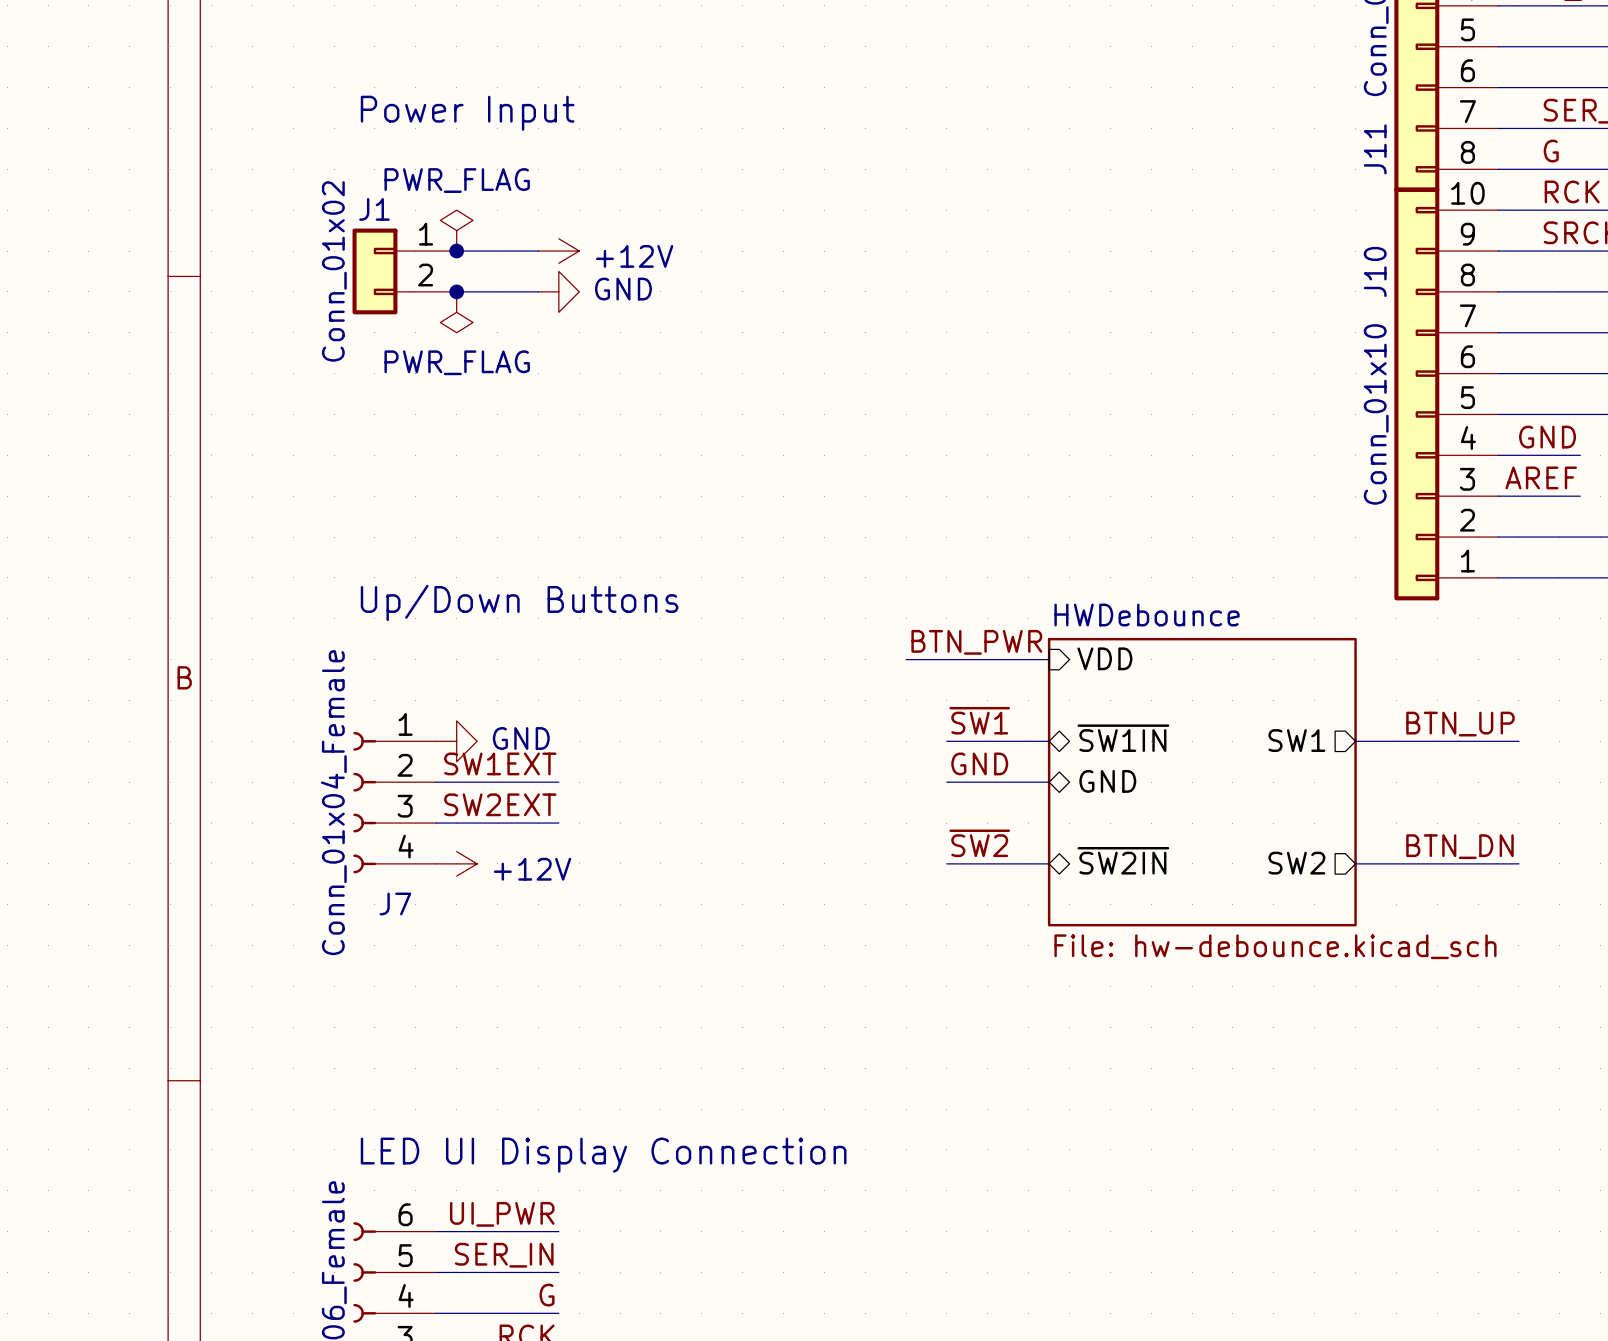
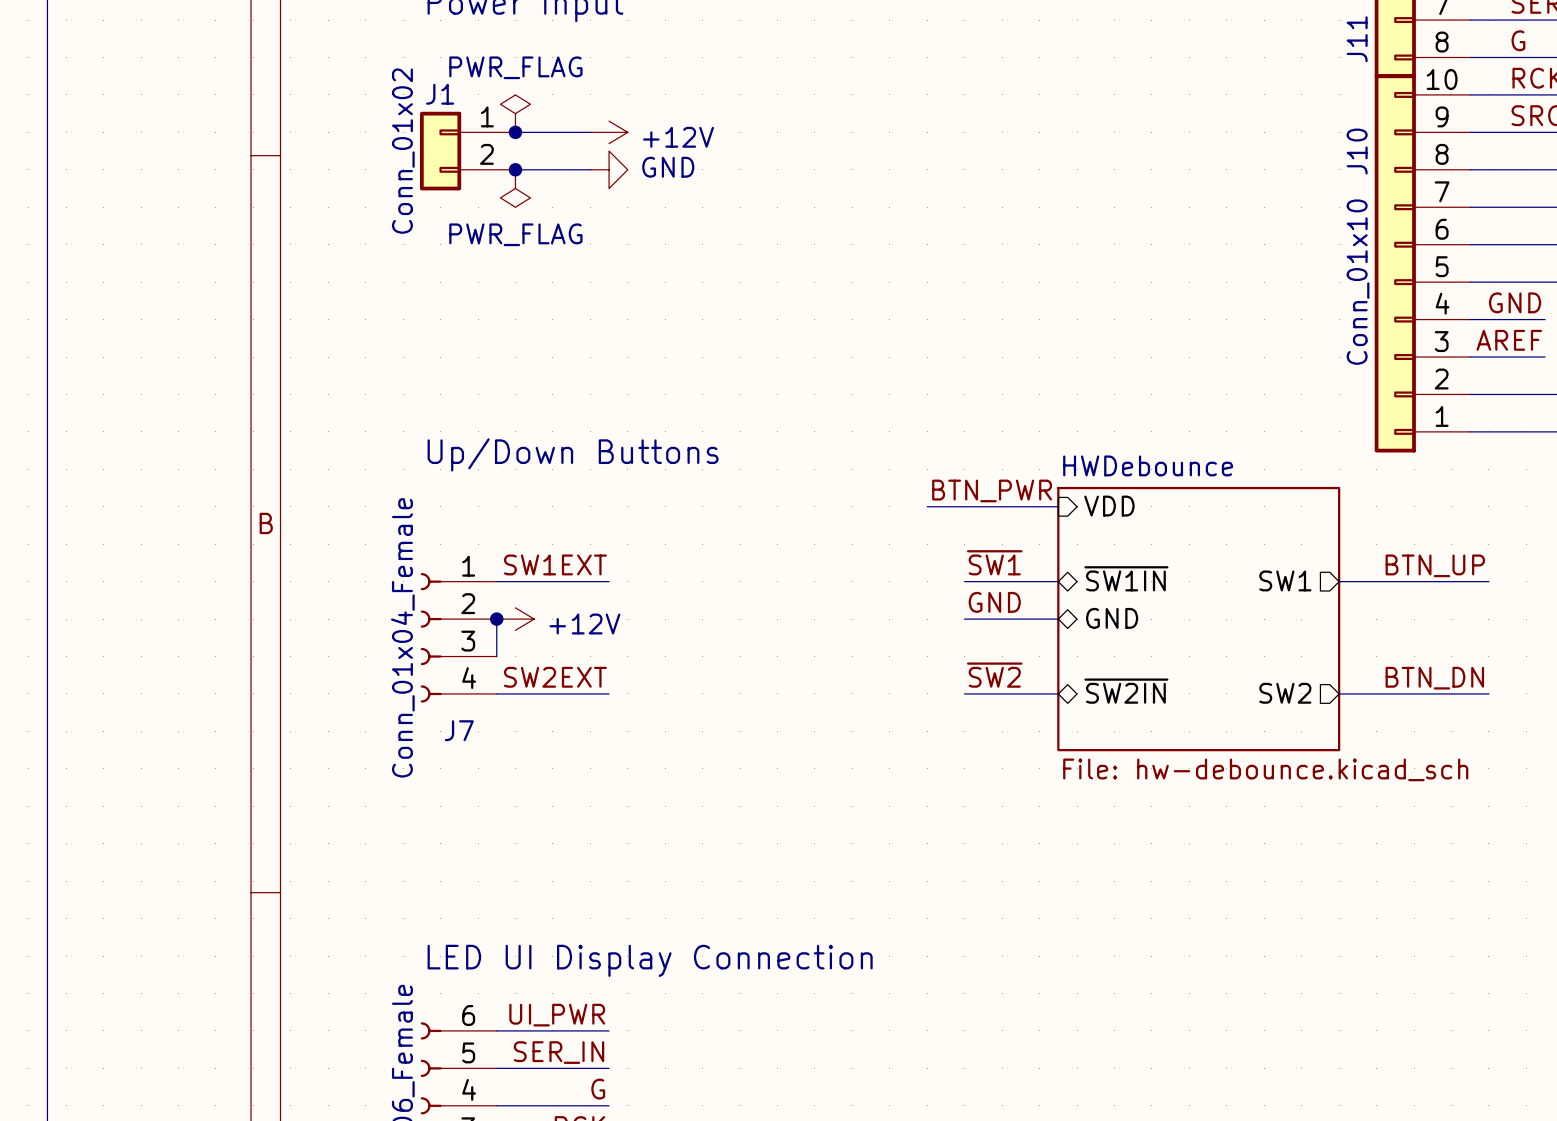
wire: none -> (496, 581) (609, 581)
power symbol: GND (456, 741) -> none
label position: SW1EXT (500, 763) -> SW1EXT (555, 564)
wire: (436, 782) (558, 782) -> (496, 619) (496, 656)
junction: none -> (496, 619)
label position: SW2EXT (500, 804) -> SW2EXT (555, 677)
wire: (436, 823) (558, 823) -> (496, 693) (609, 693)
power symbol position: +12V (456, 863) -> +12V (515, 619)

